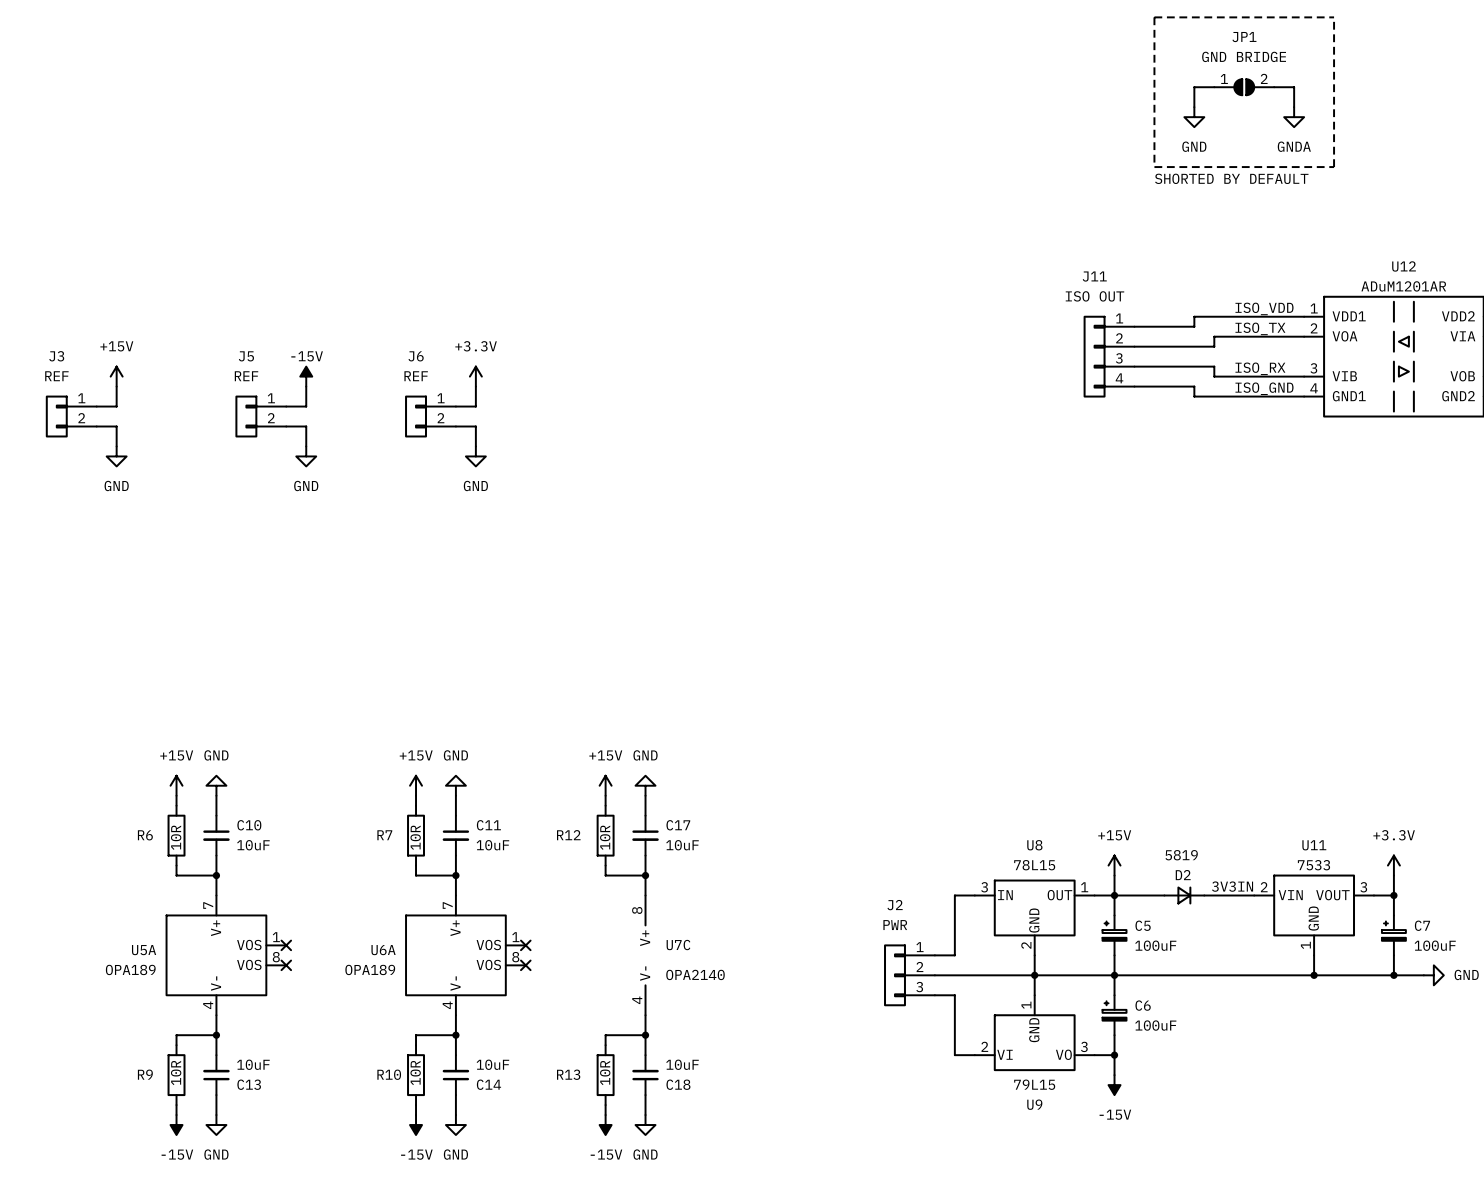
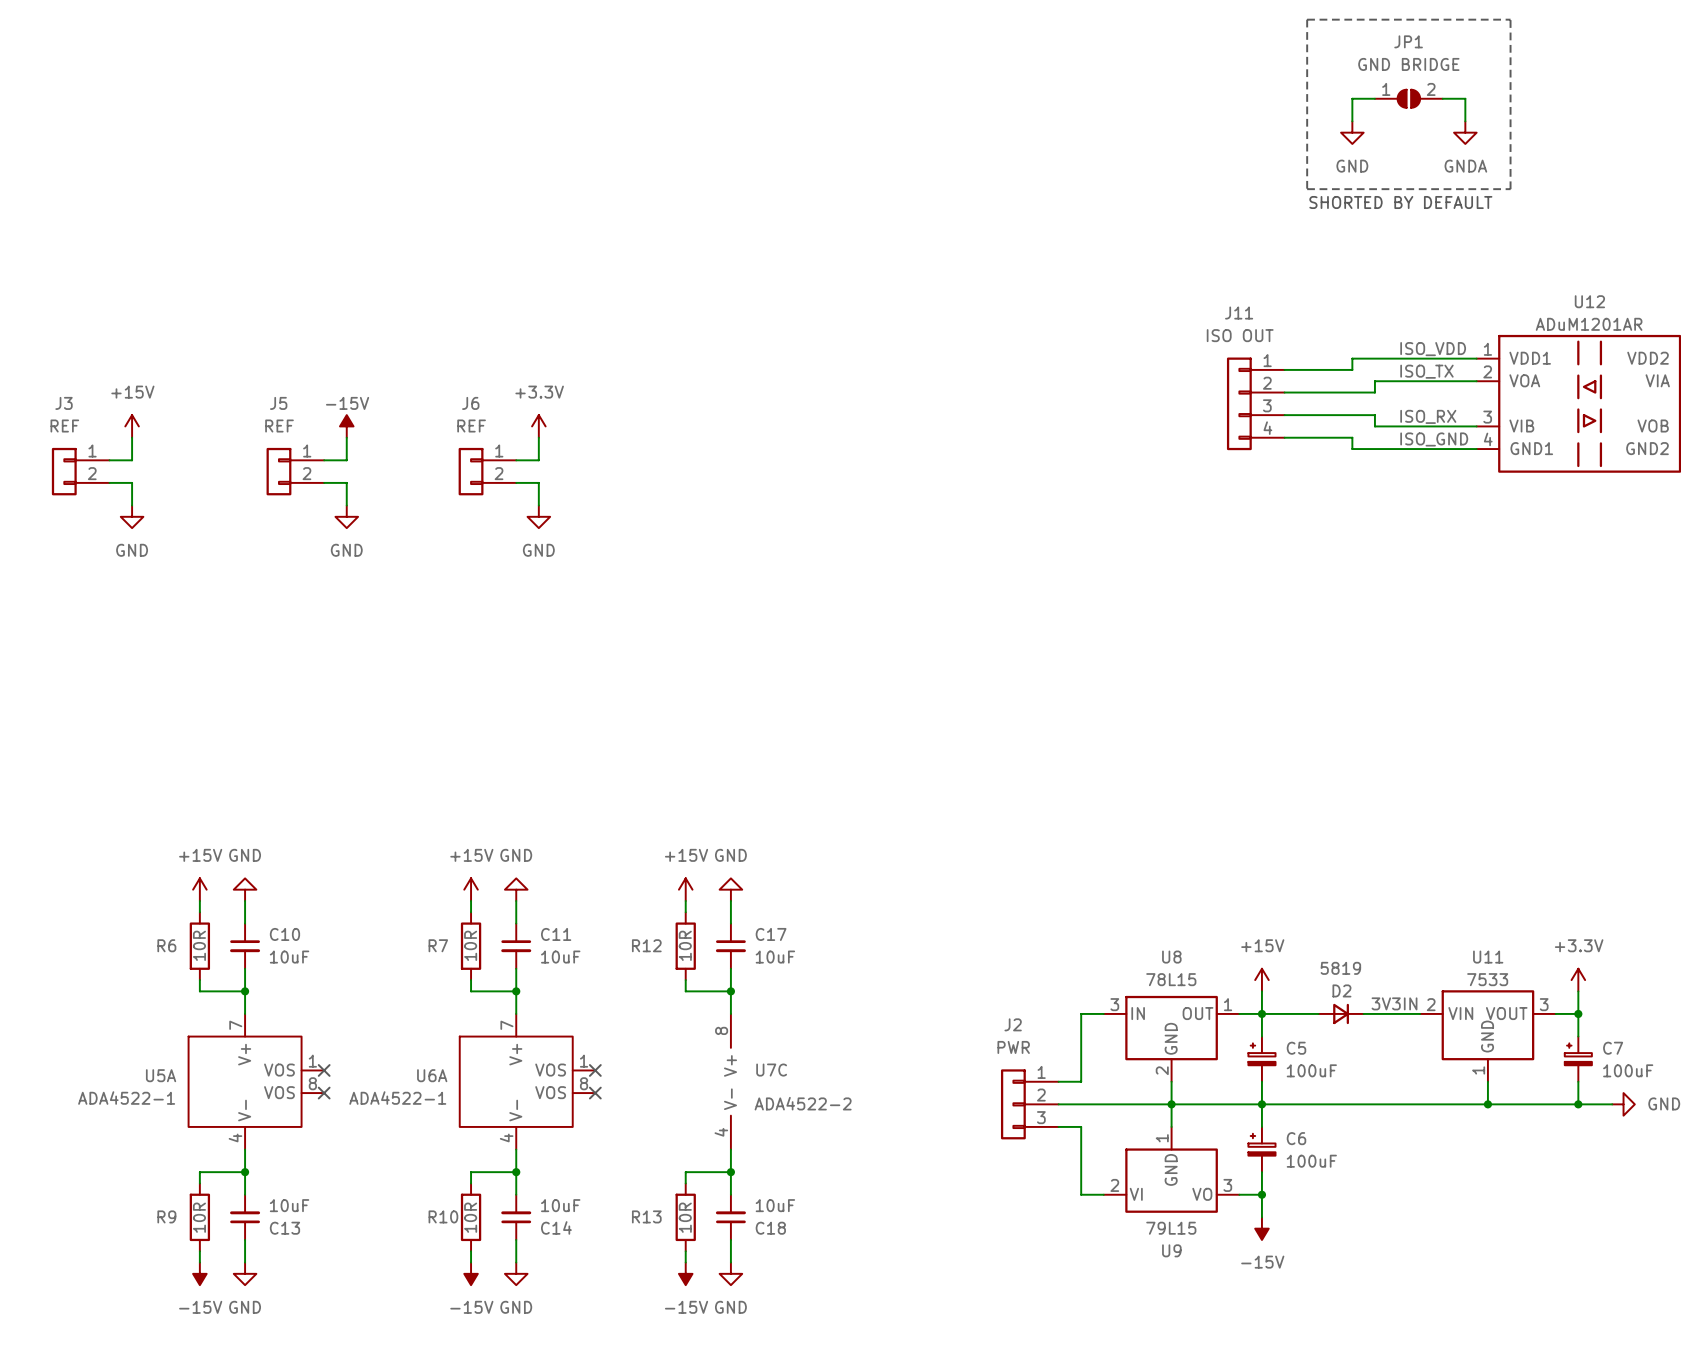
U5A value: OPA189 (130, 969) -> ADA4522-1 (126, 1098)
U6A value: OPA189 (370, 969) -> ADA4522-1 (397, 1098)
U7C value: OPA2140 (695, 974) -> ADA4522-2 (803, 1103)

